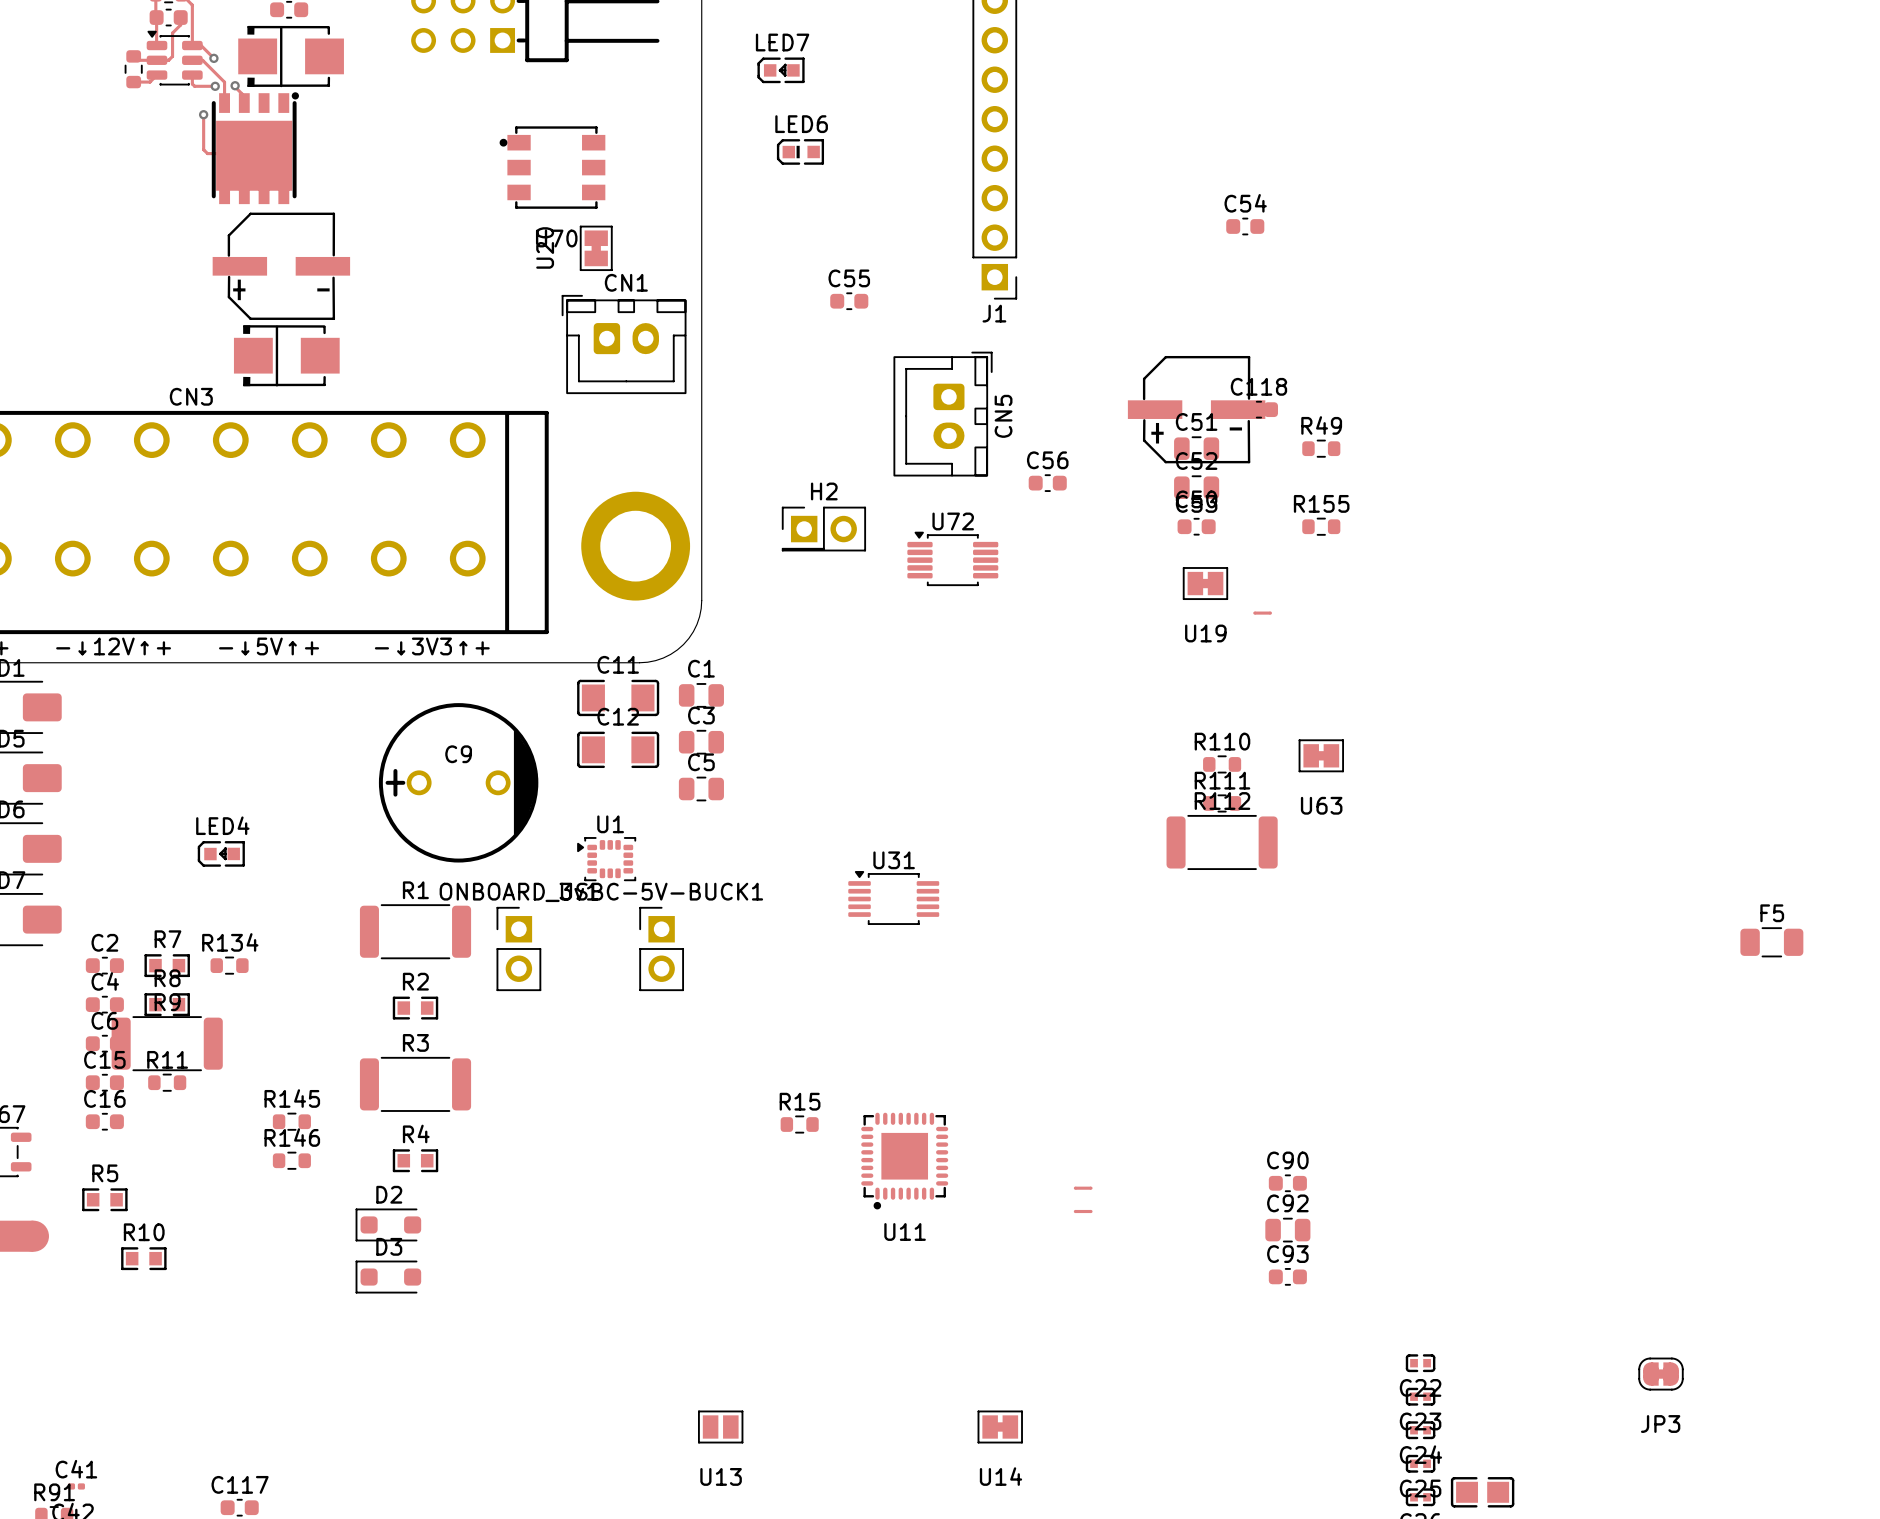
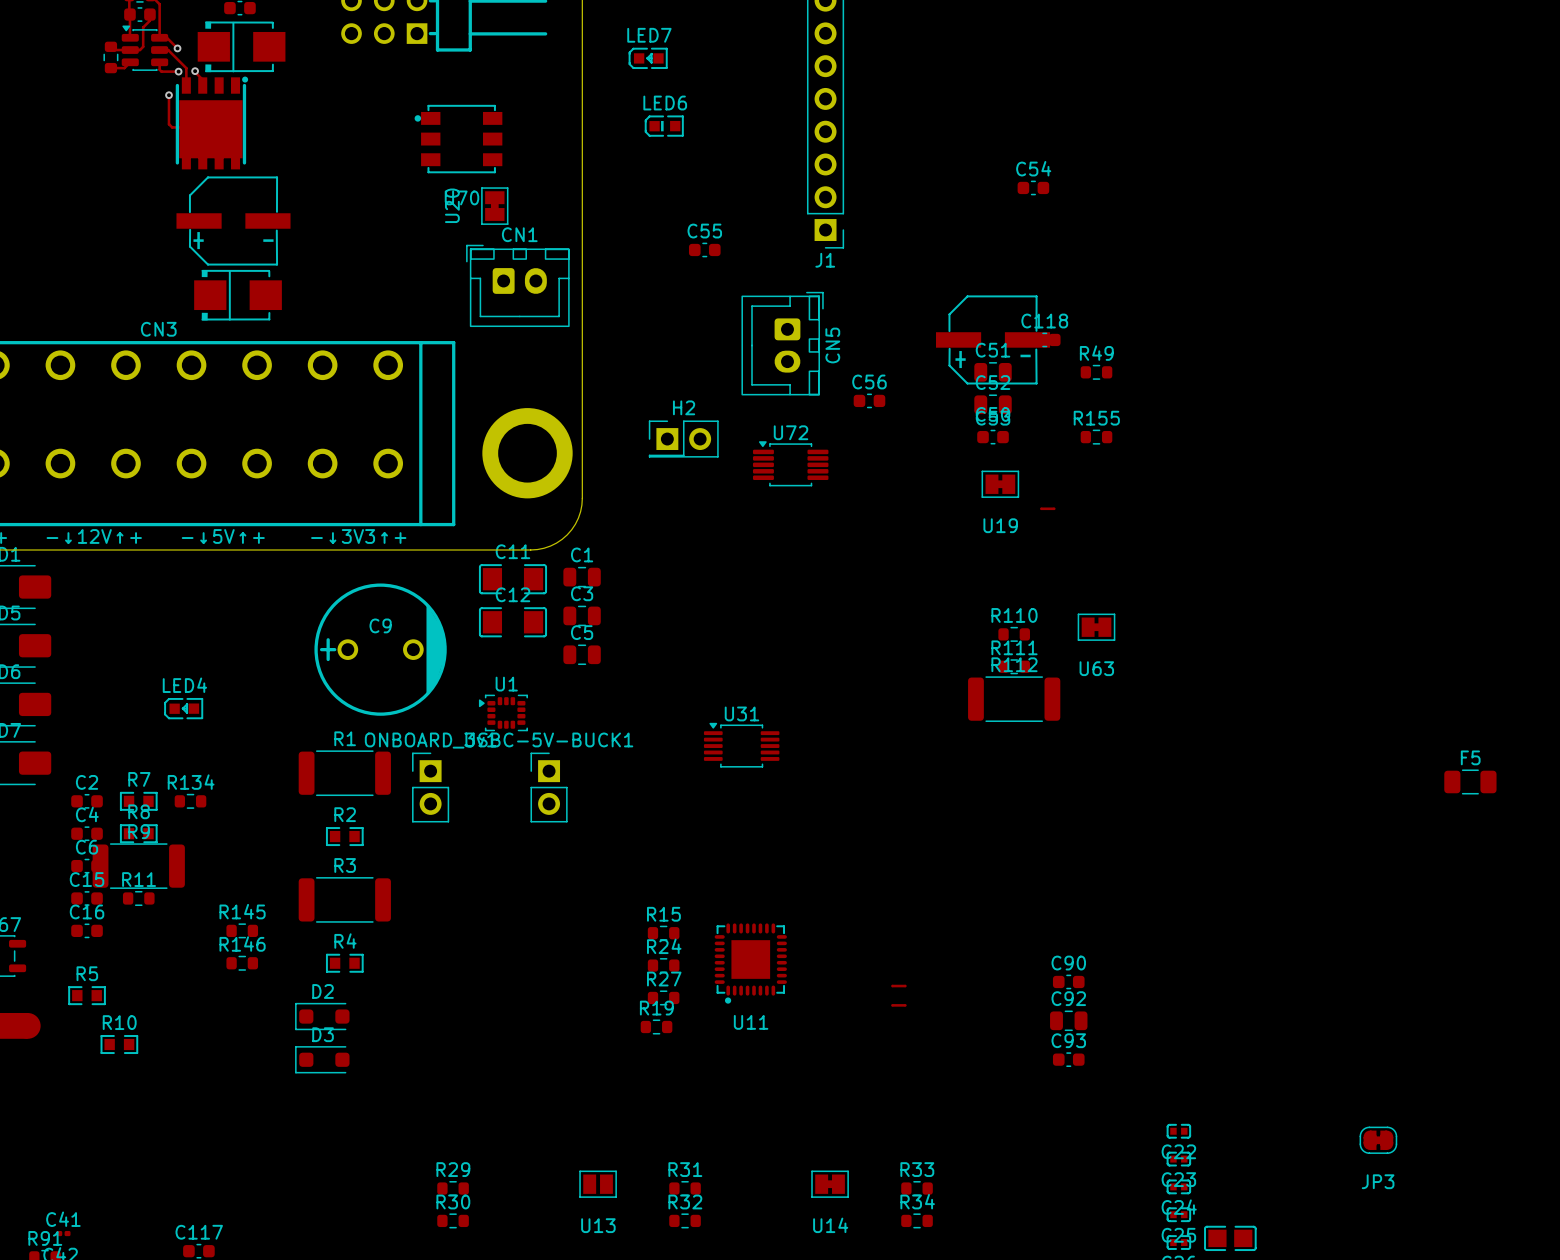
R24: none -> (663, 965)
R27: none -> (663, 997)
R19: none -> (656, 1026)
R29: none -> (453, 1188)
R31: none -> (685, 1188)
R33: none -> (917, 1188)
R30: none -> (453, 1220)
R32: none -> (685, 1220)
R34: none -> (917, 1220)

